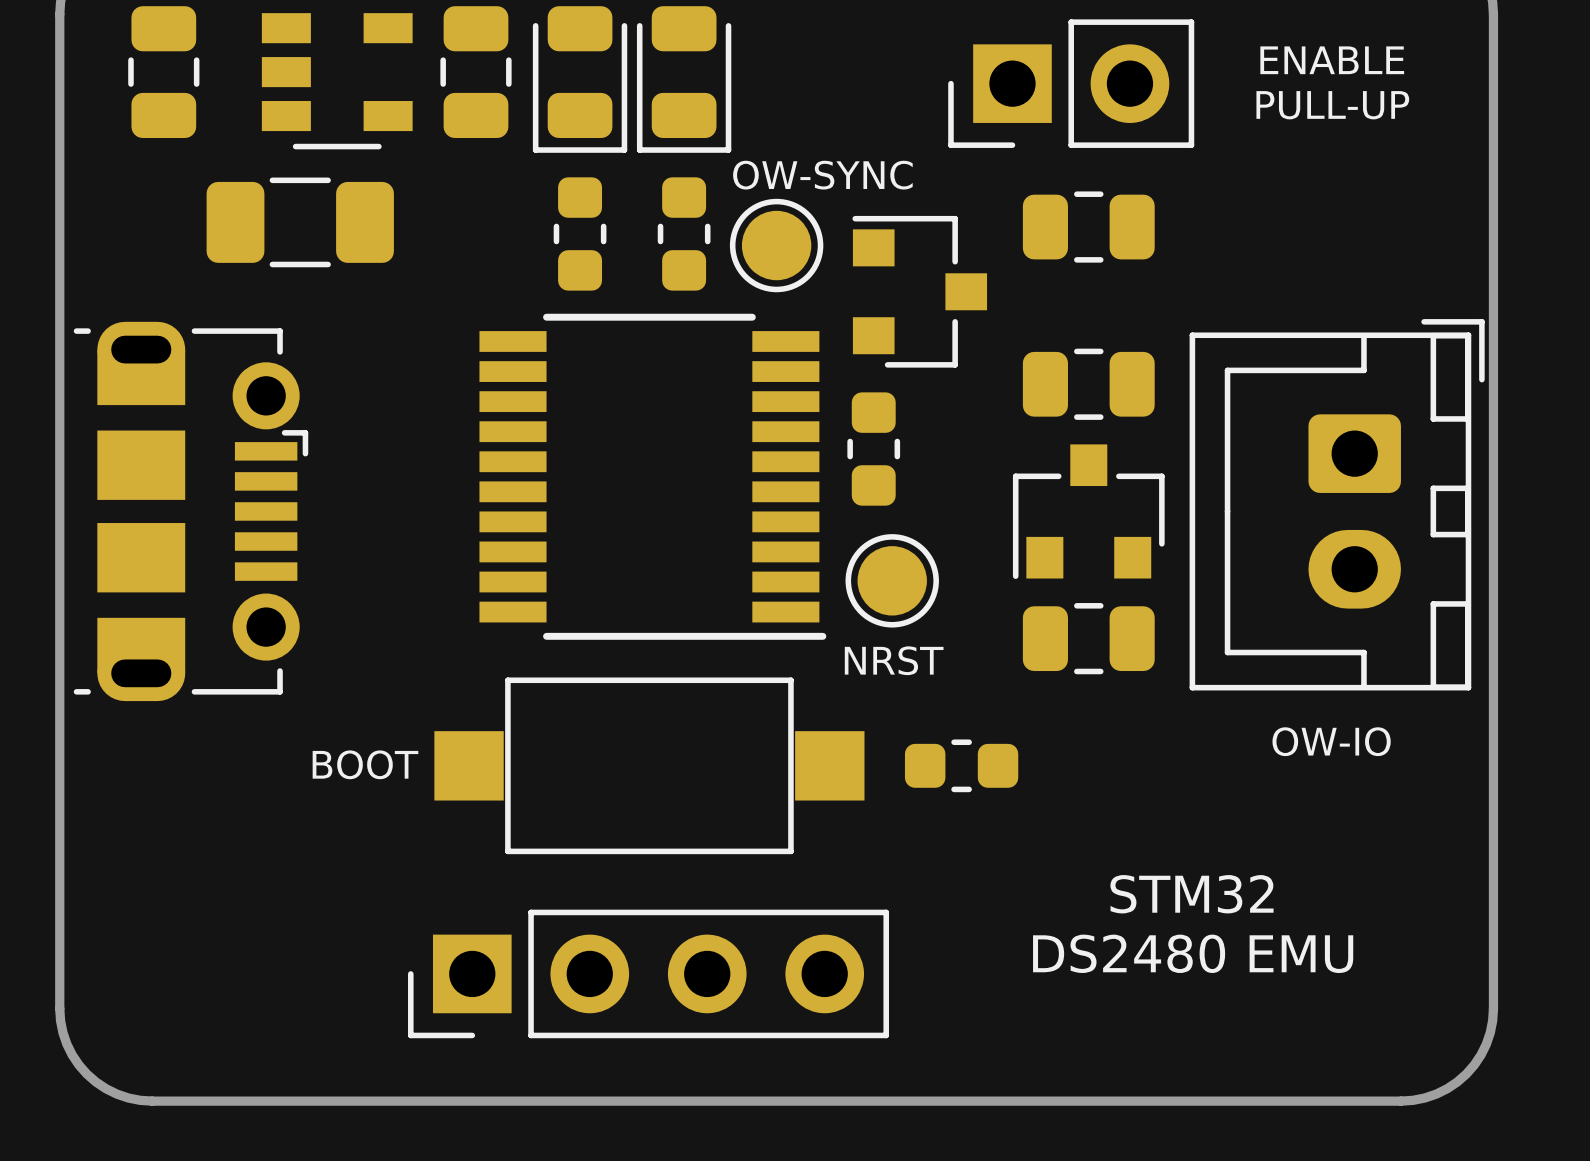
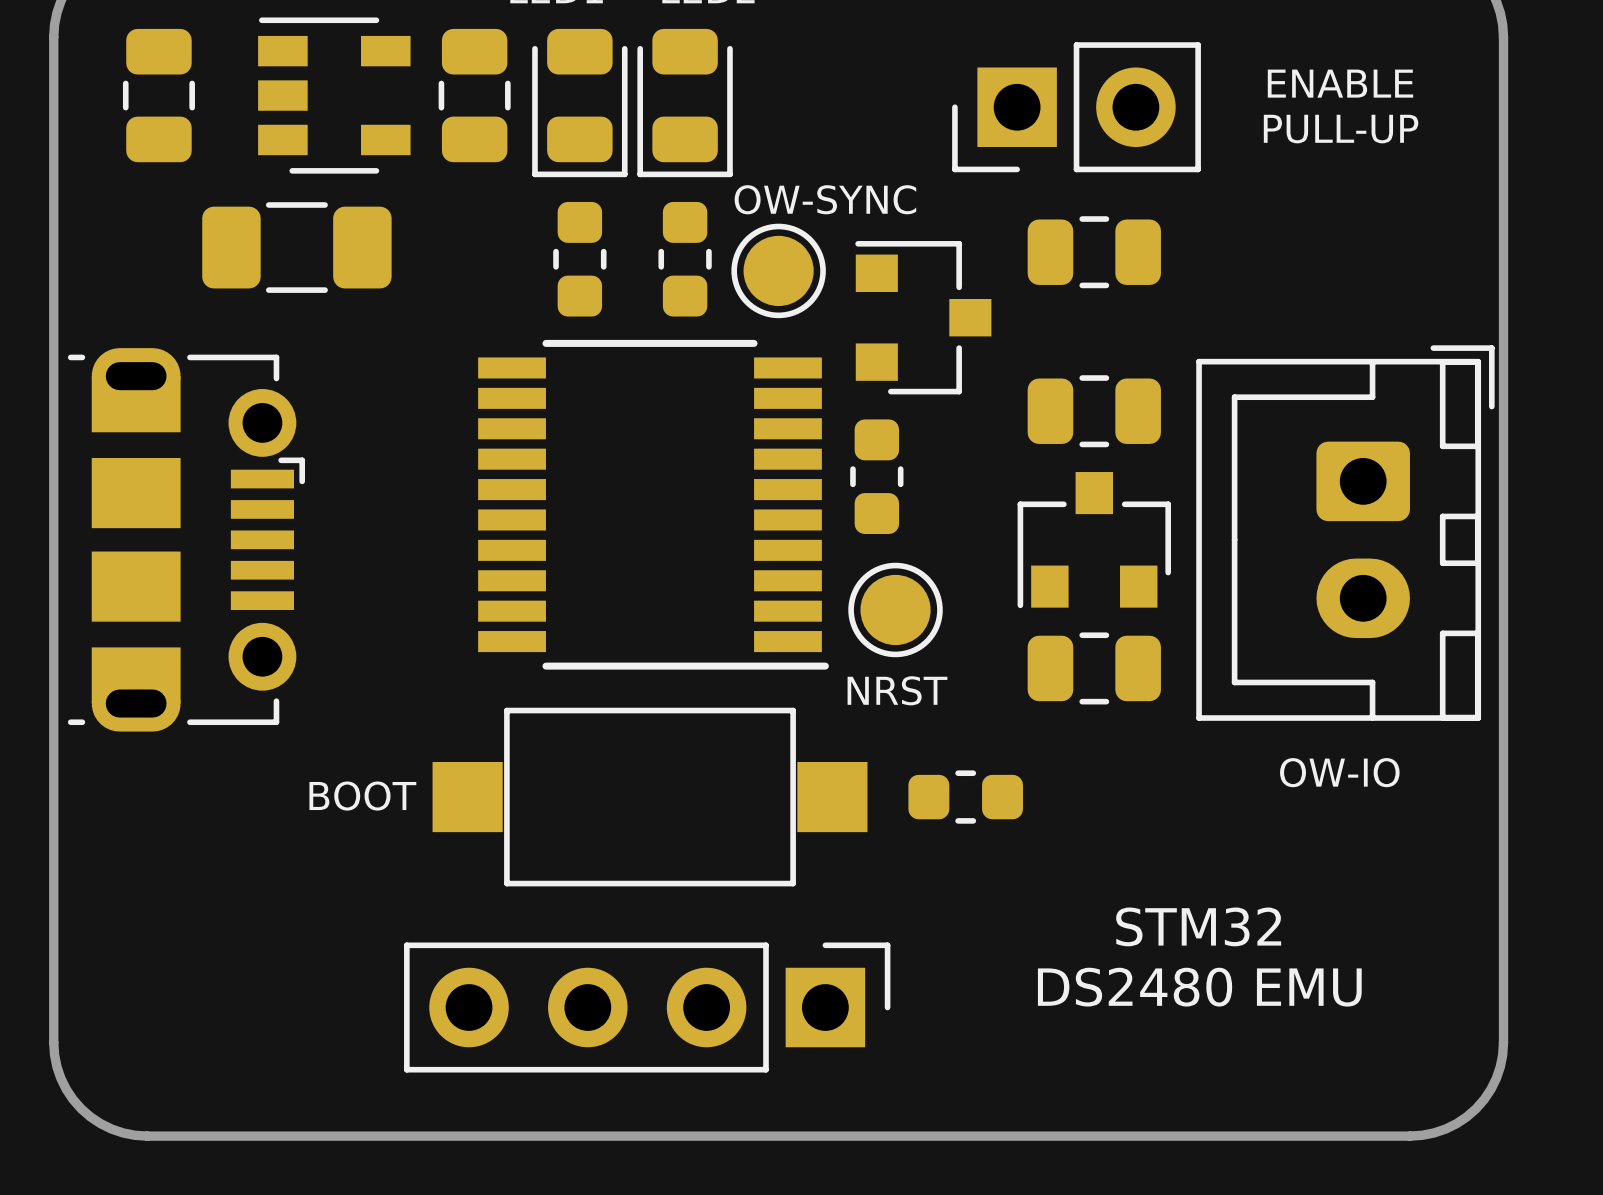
part rotation: 0° (648, 973) -> 180° (647, 1007)

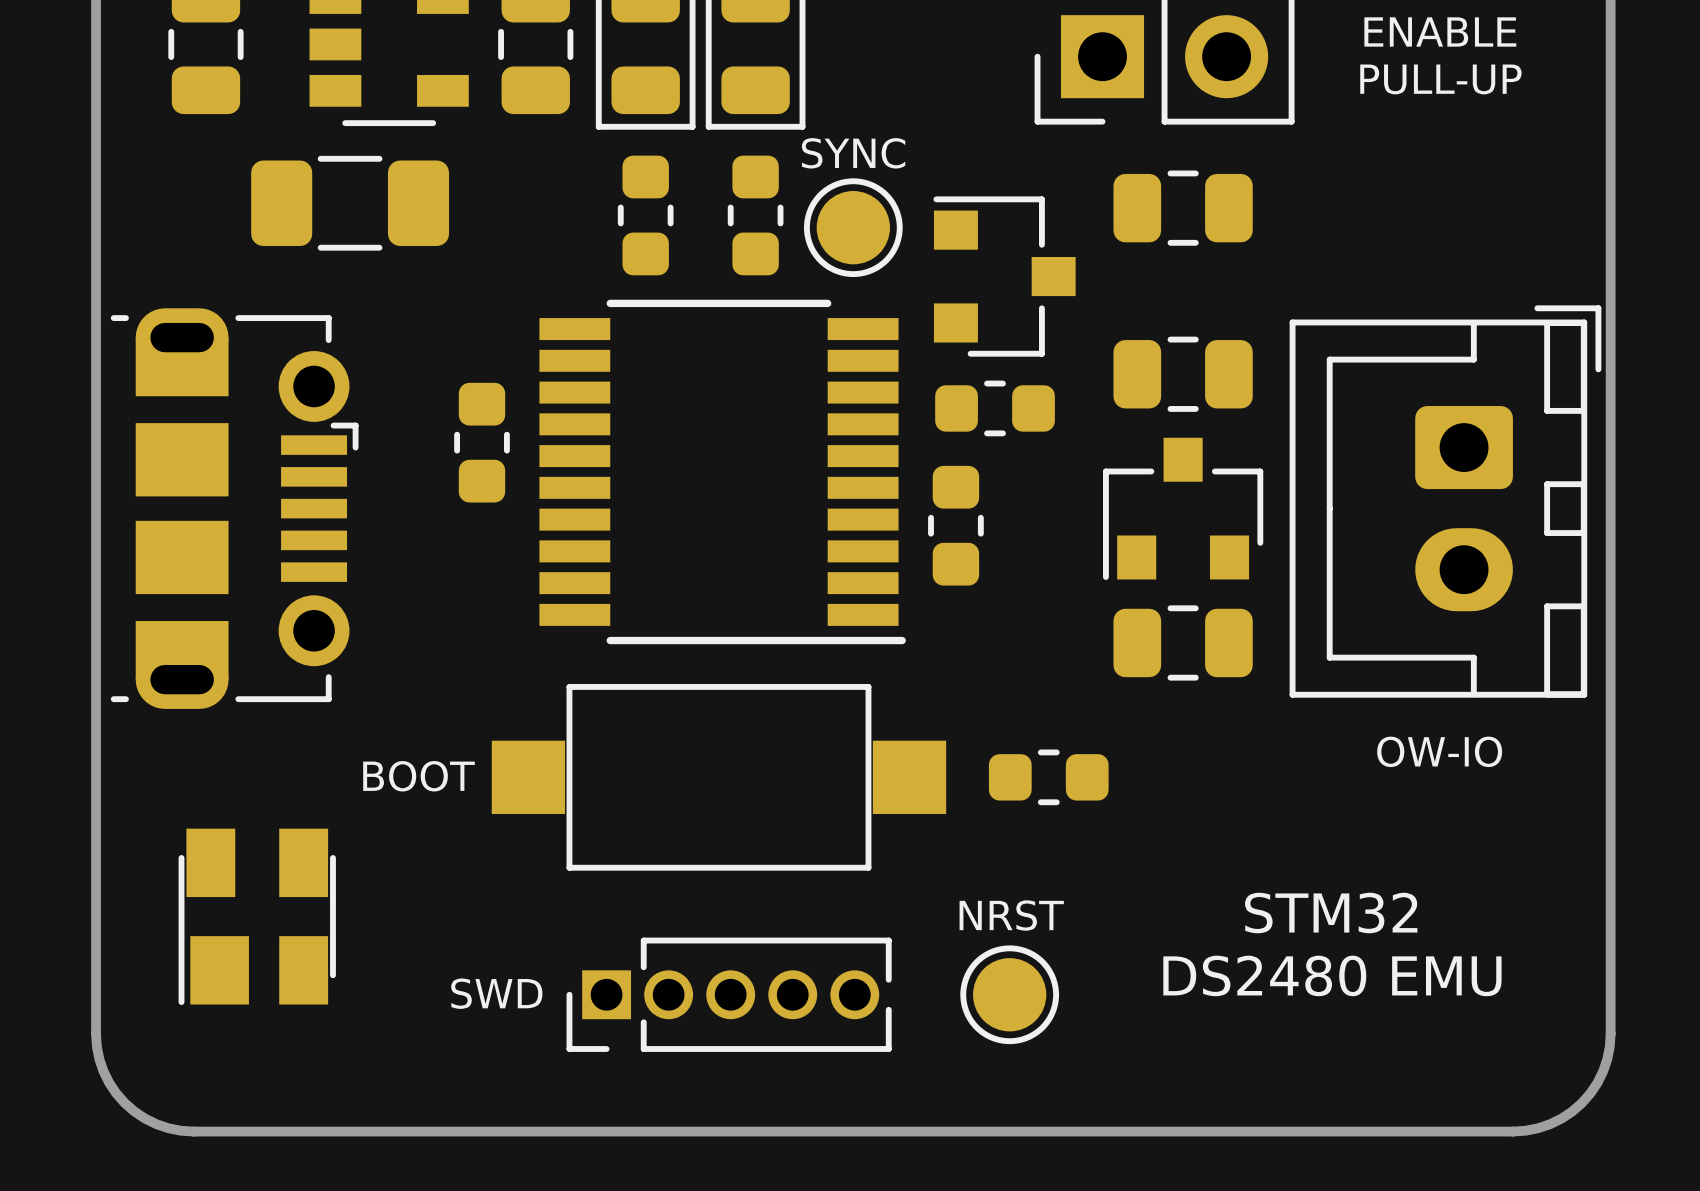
part value: OW-SYNC (825, 199) -> SYNC (853, 153)
part: none -> (995, 408)
part: none -> (482, 442)
part: (876, 476) -> none
part: none -> (955, 525)
part position: (895, 609) -> (1009, 994)
part value position: NRST (897, 690) -> NRST (1011, 915)
text position: STM32 (1198, 926) -> STM32 (1331, 913)
part: none -> (257, 916)
part footprint: [404, 942, 891, 1073] -> [566, 937, 892, 1052]
text position: DS2480 EMU (1199, 987) -> DS2480 EMU (1332, 975)
part value: none -> SWD (496, 993)

